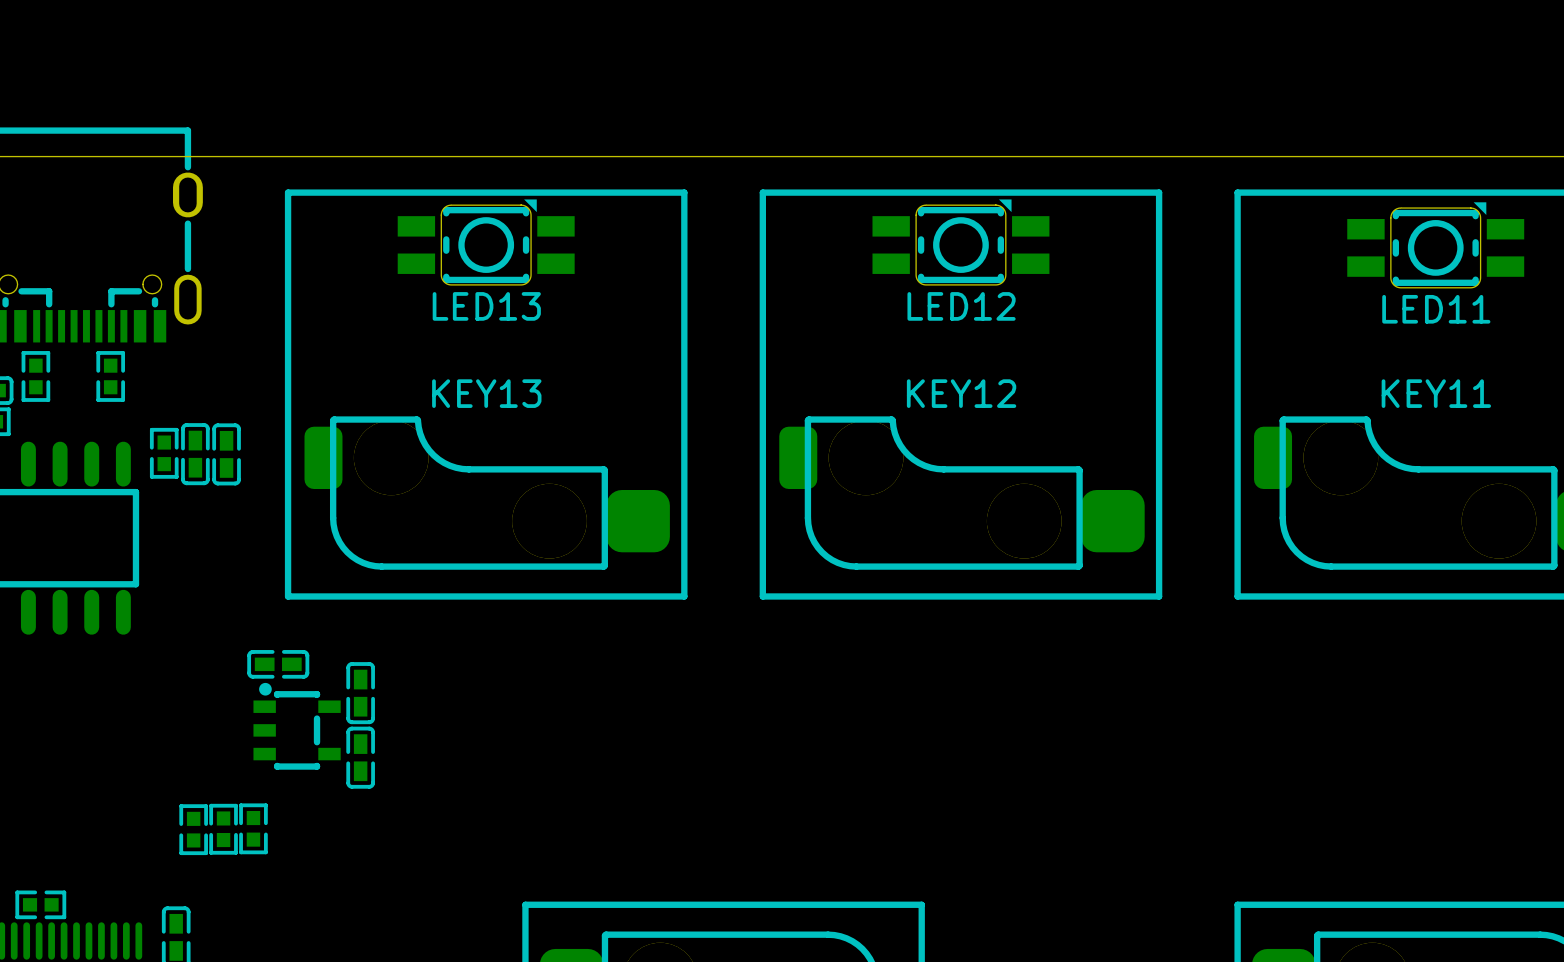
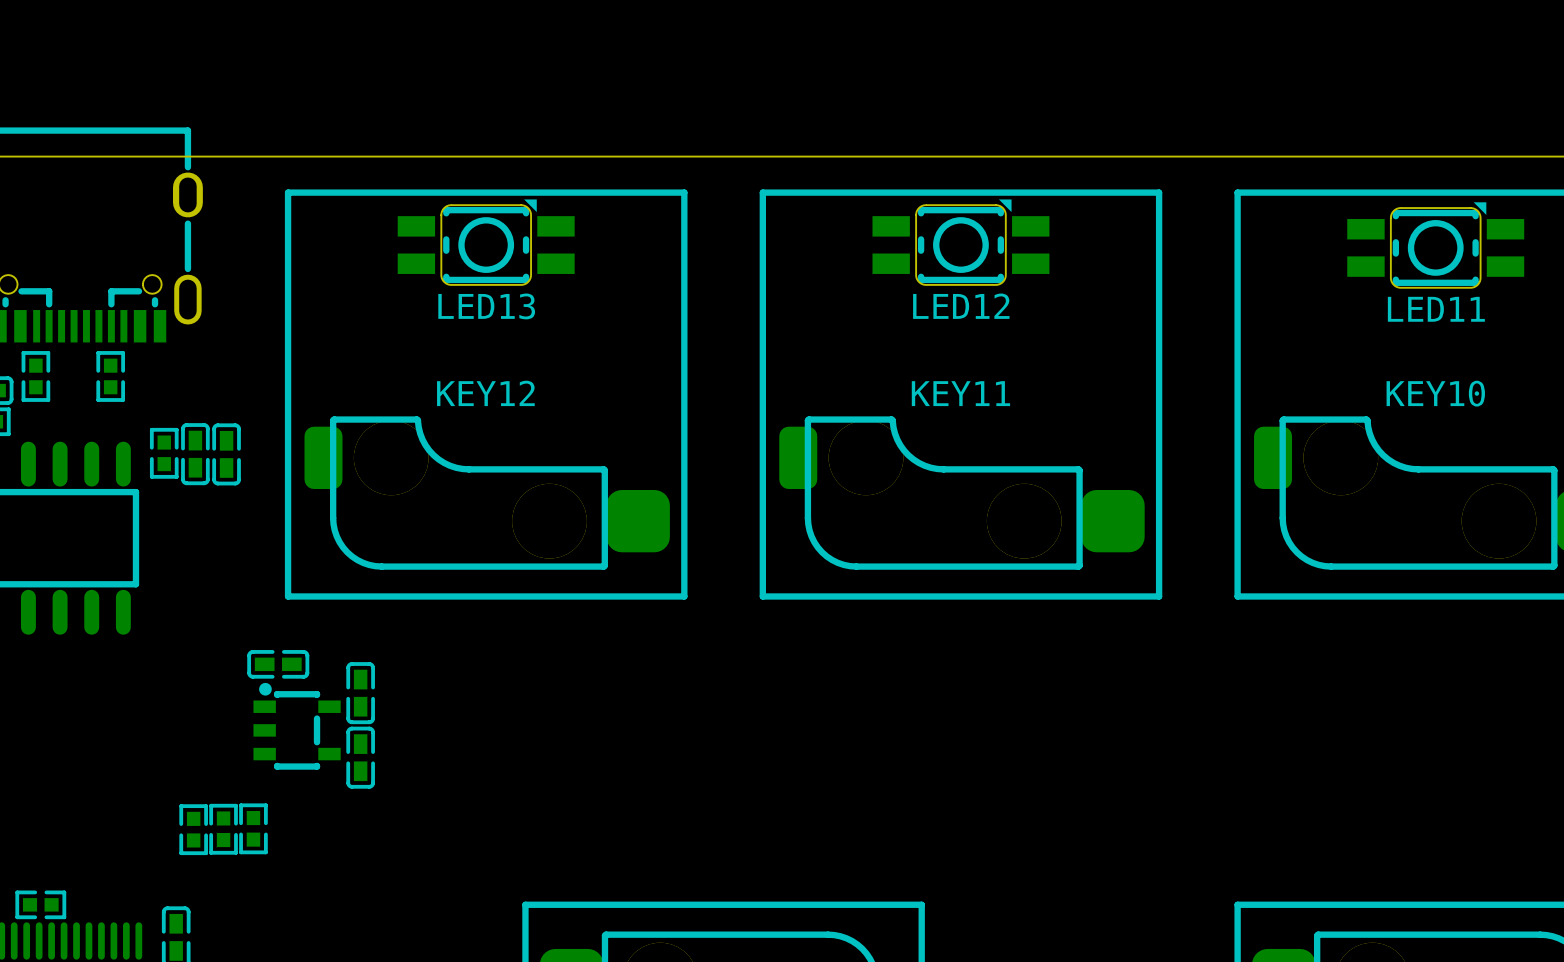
KEY13 name: KEY13 (486, 393) -> KEY12 (485, 393)
KEY12 name: KEY12 (961, 393) -> KEY11 (960, 393)
KEY11 name: KEY11 (1436, 393) -> KEY10 (1435, 393)

